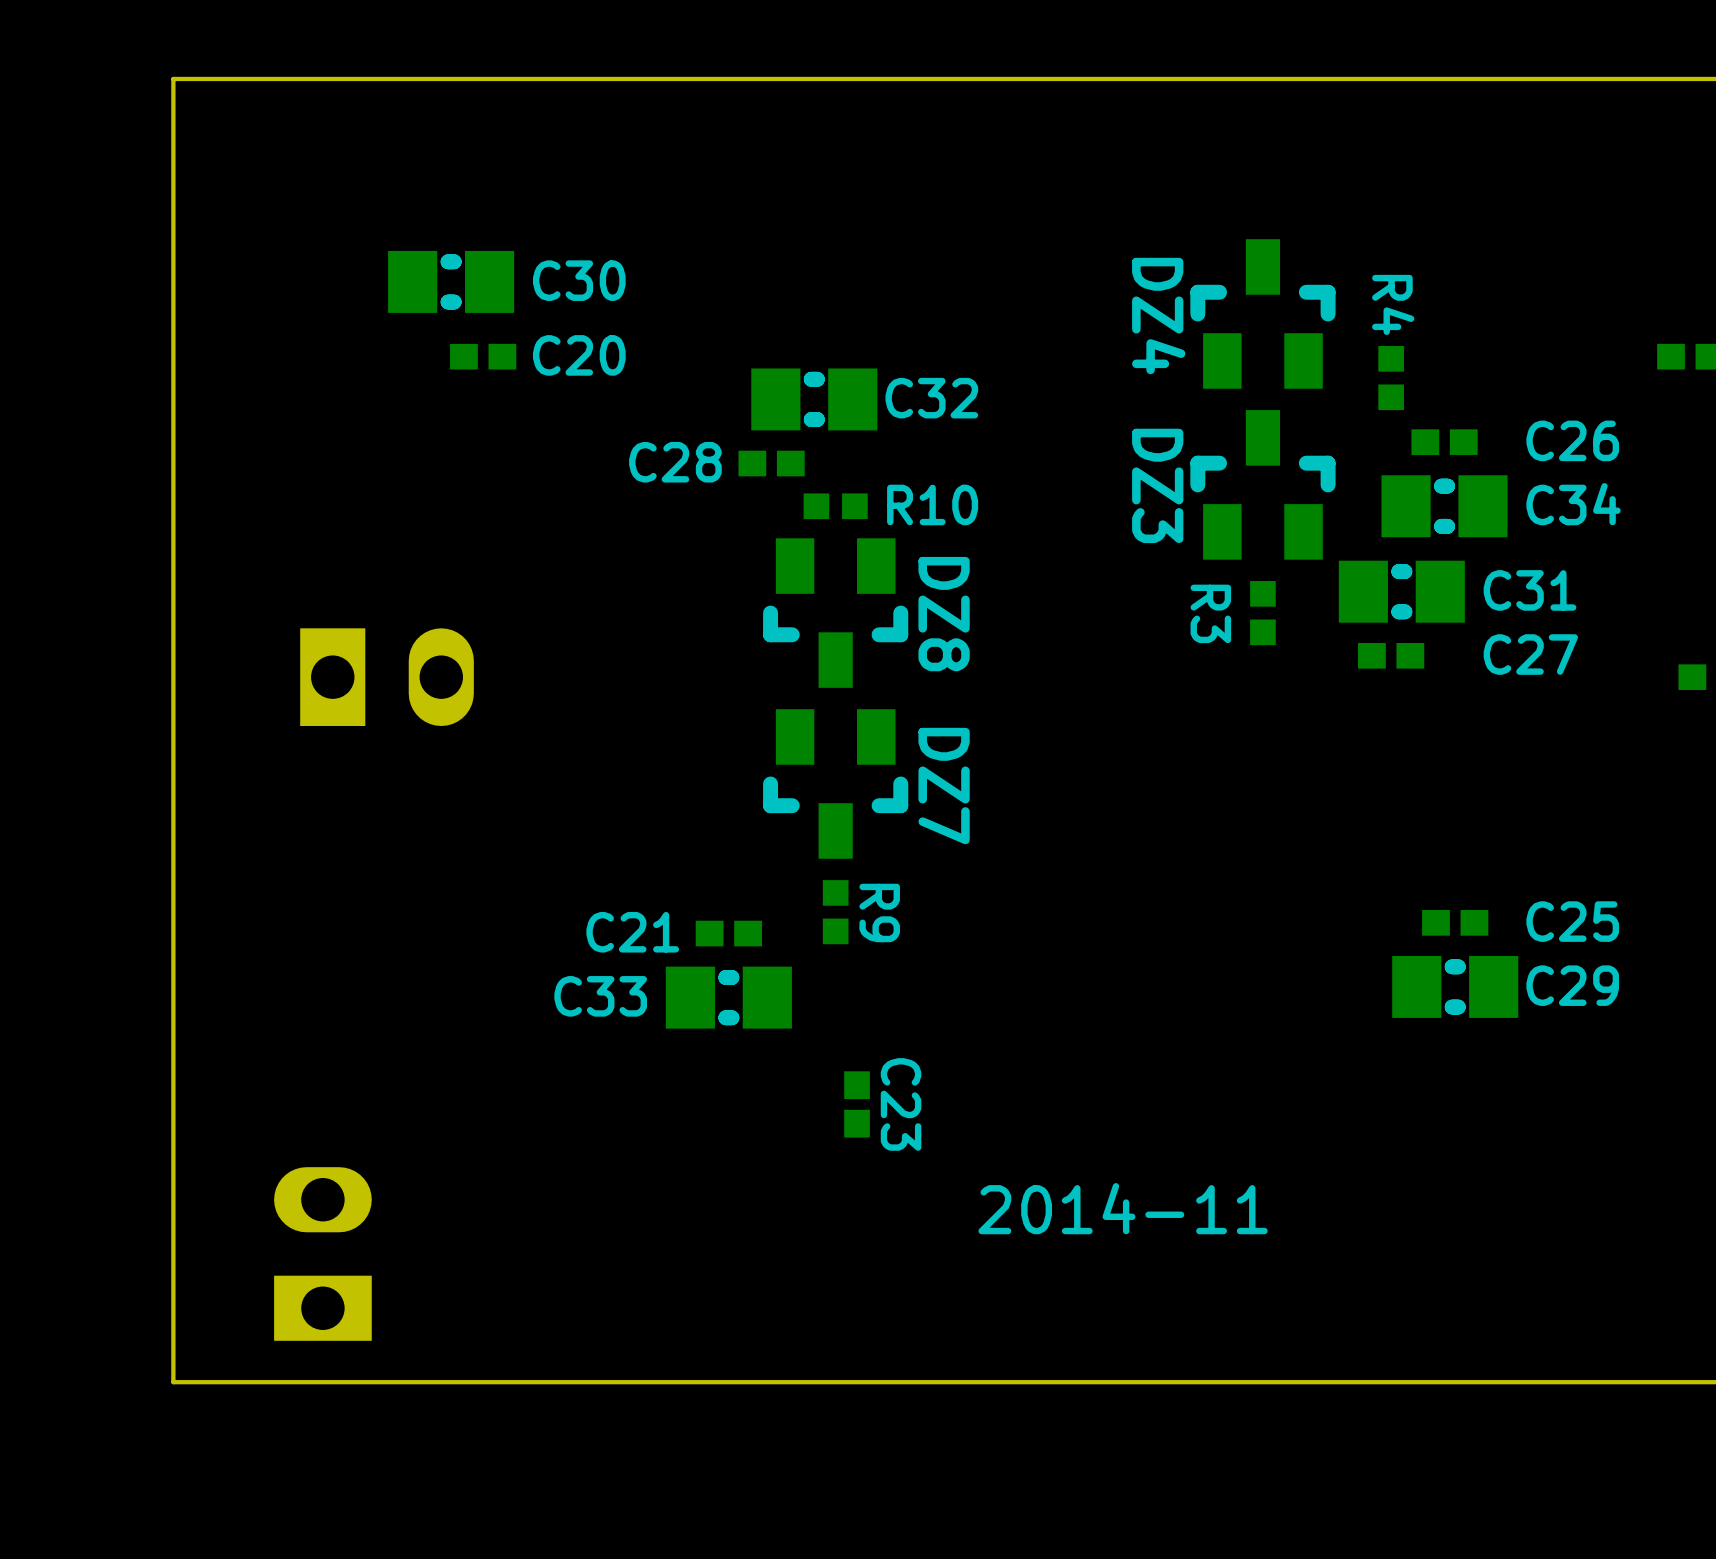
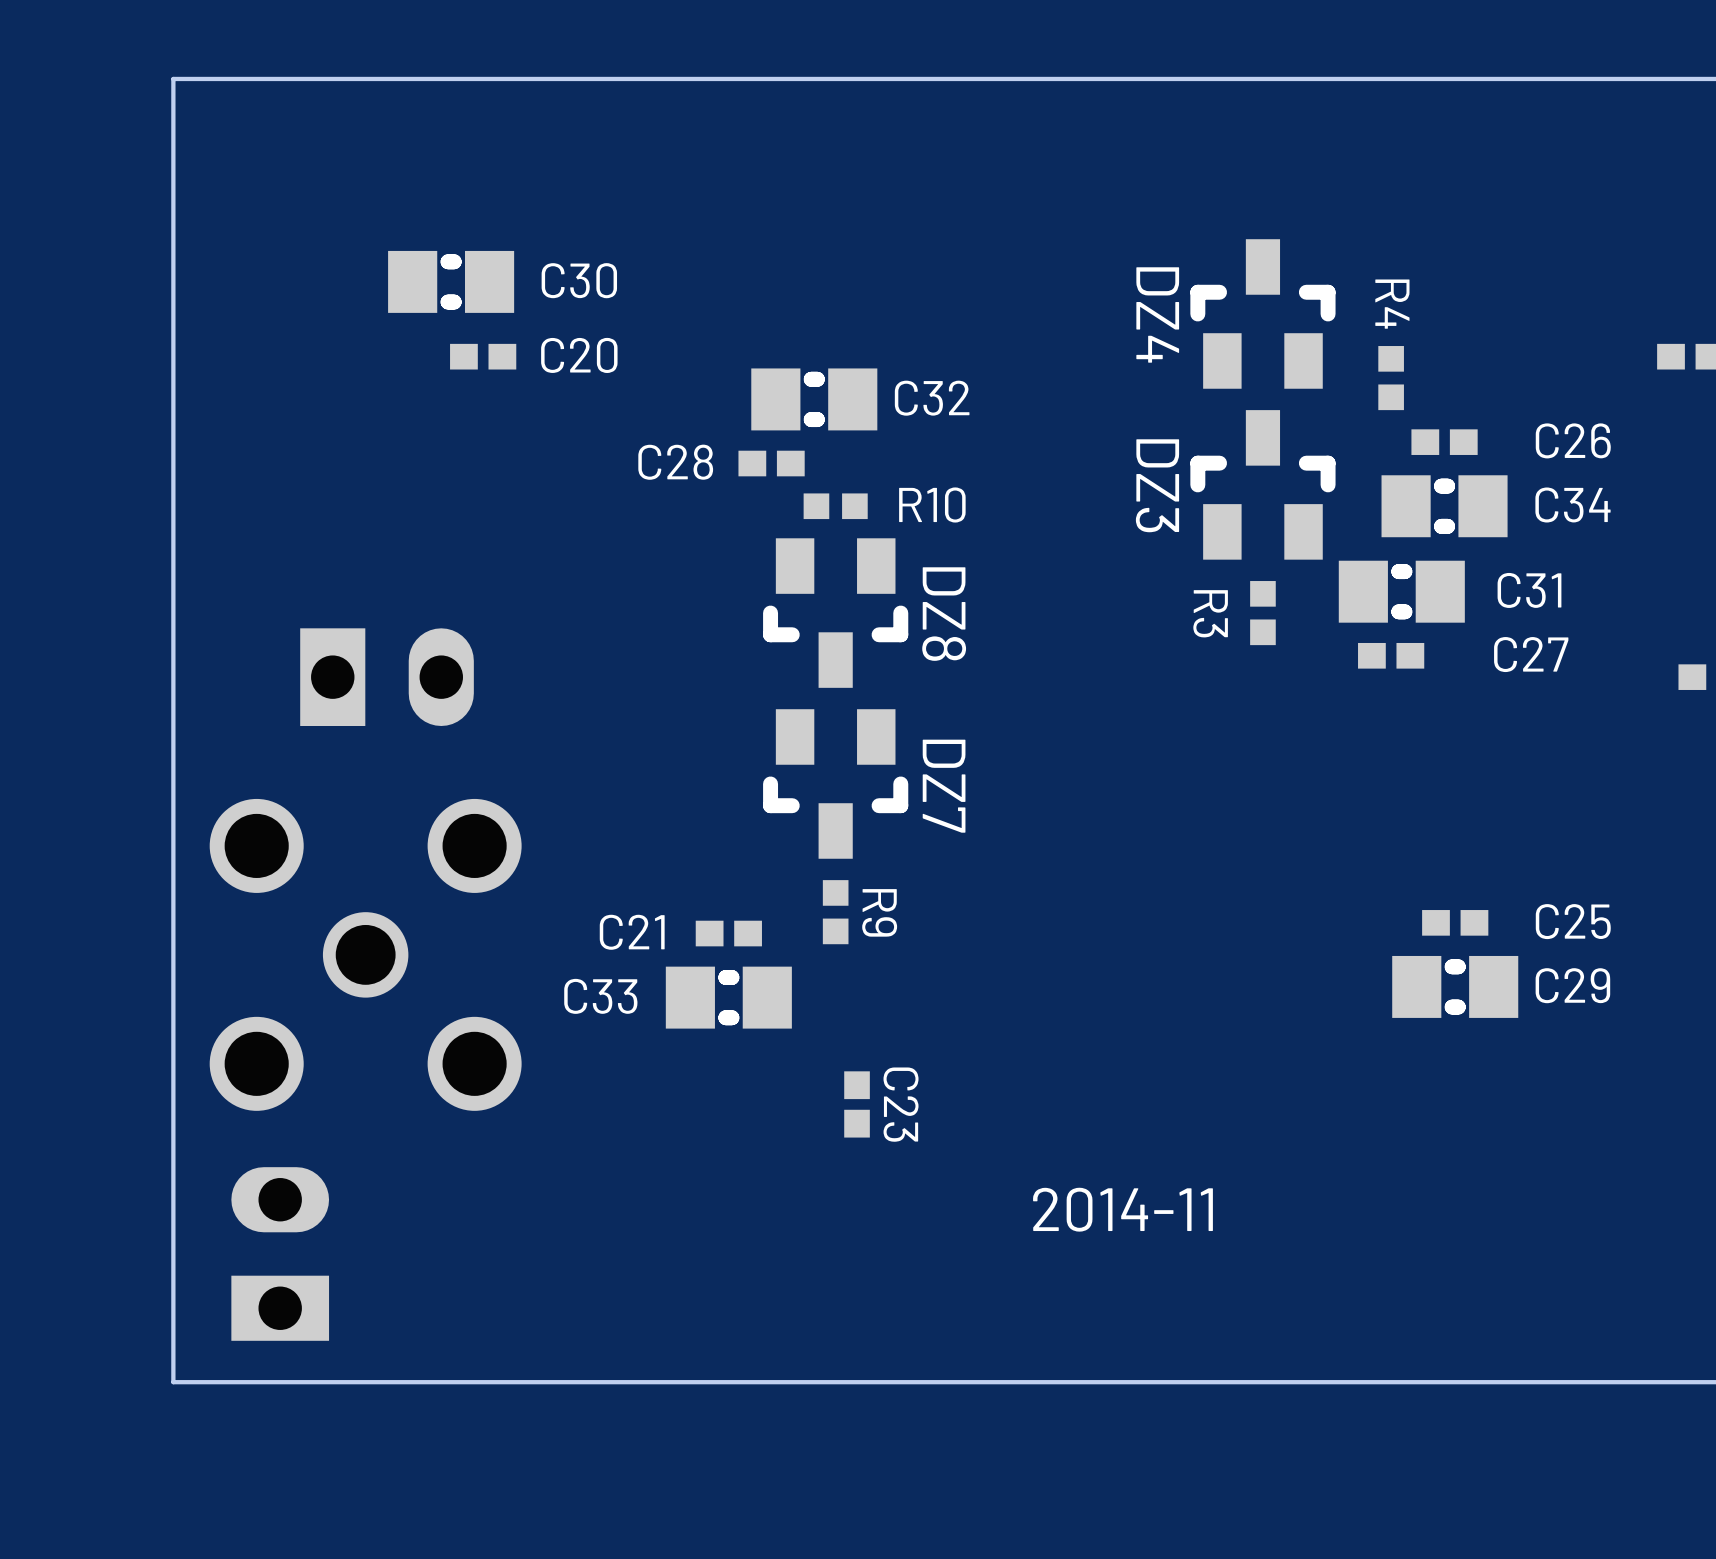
part: none -> (365, 954)
part position: (322, 1253) -> (280, 1253)

